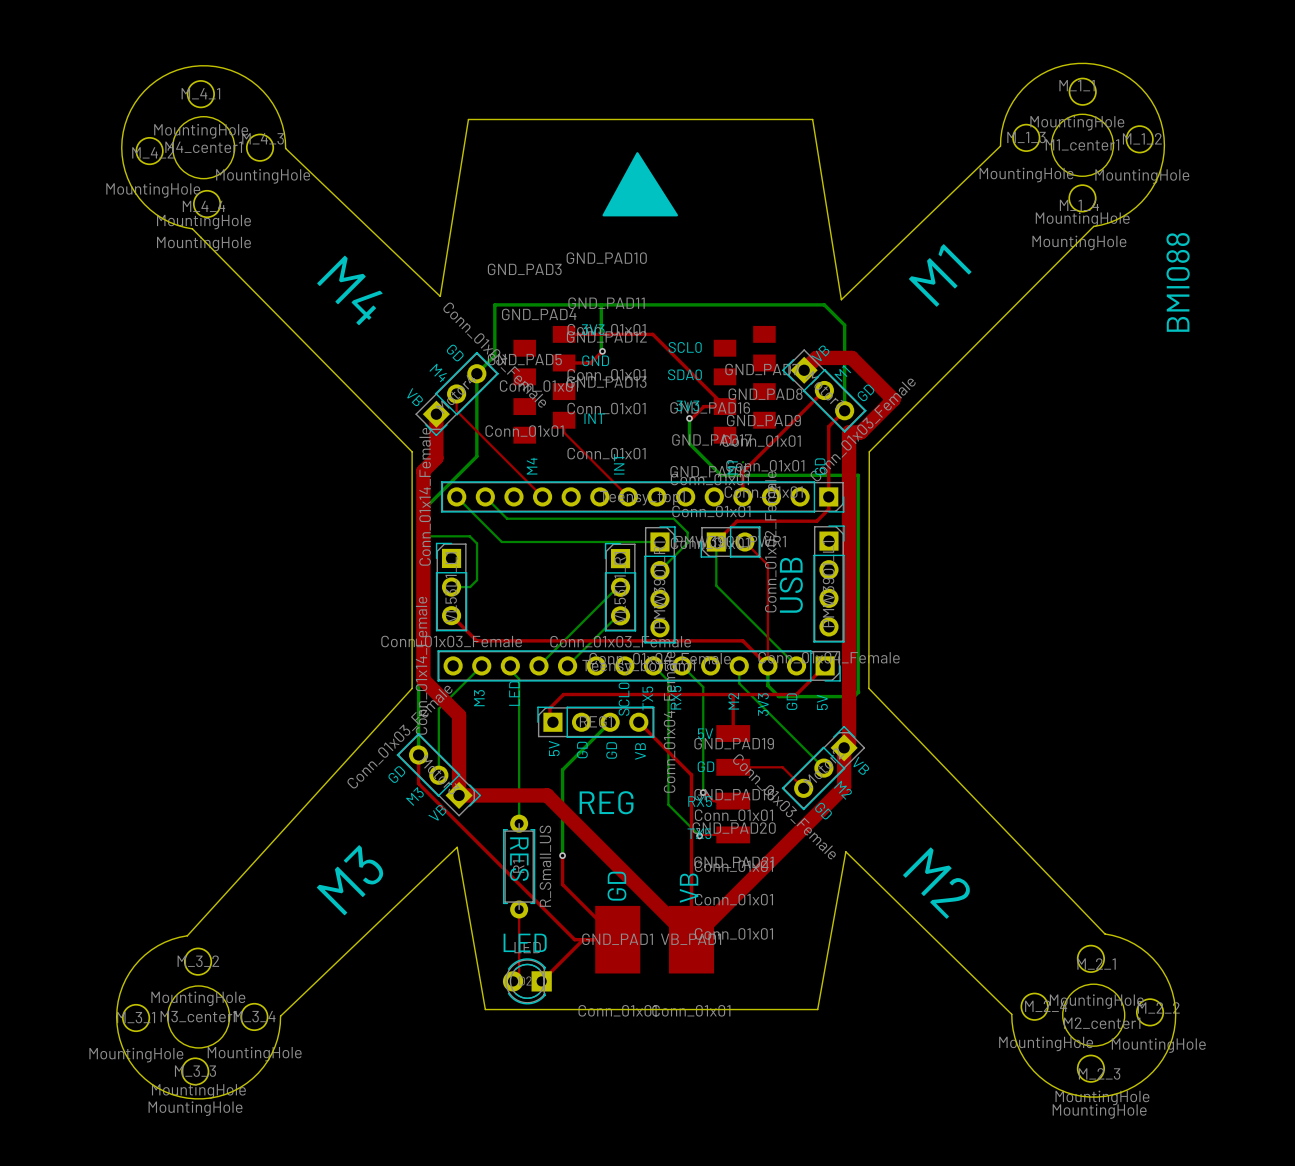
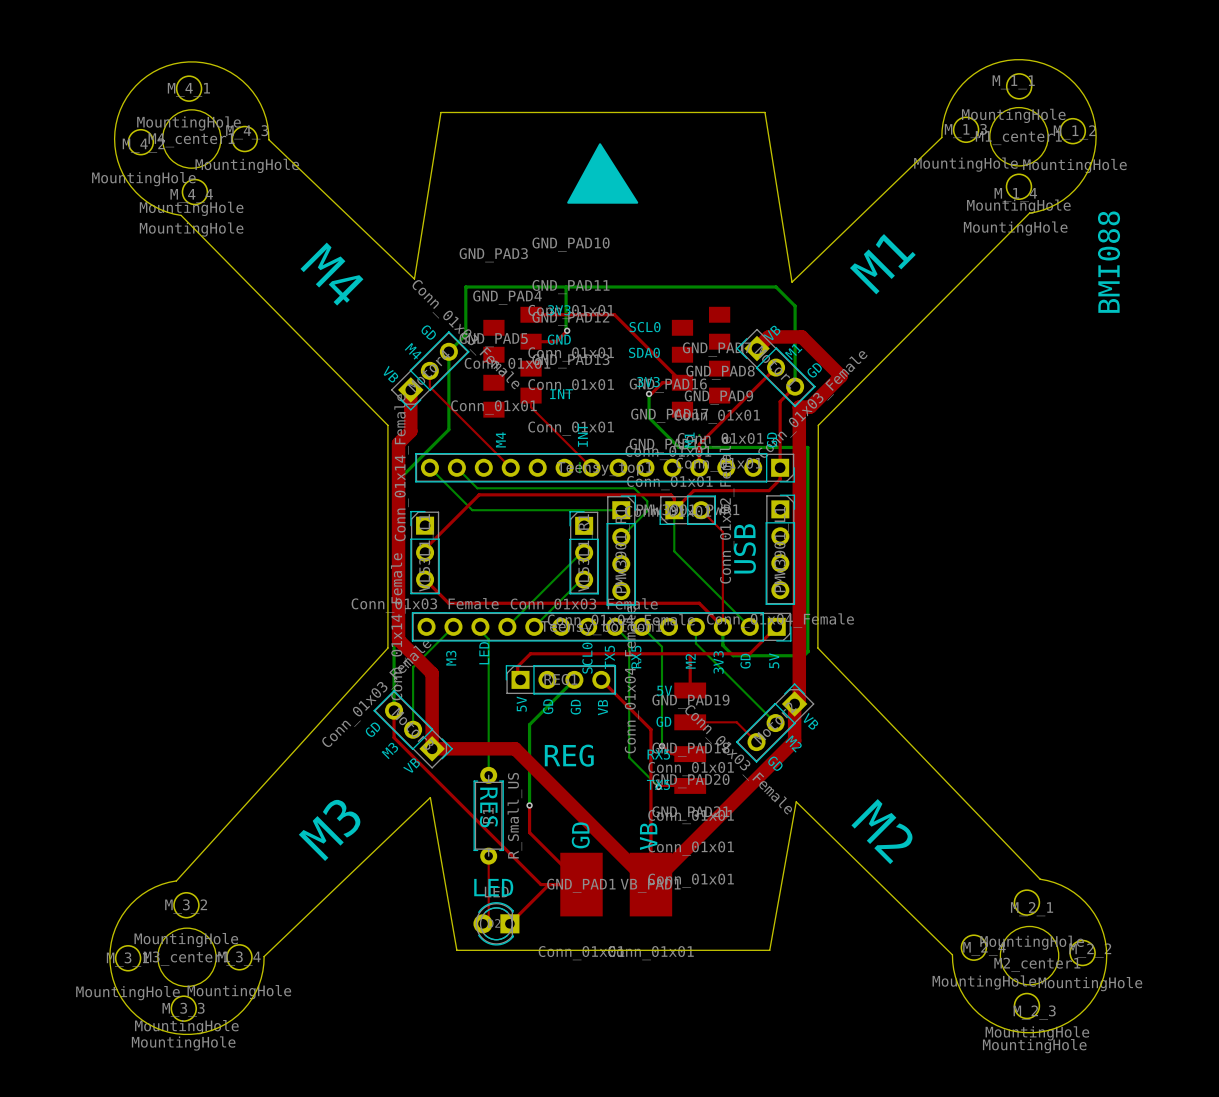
bottom track: none -> (579, 462) (579, 472)
bottom track: (418, 536) (469, 536) (477, 543) (477, 580) (470, 587) (451, 587) -> none
top track: none -> (674, 510) (674, 498) (670, 494) (479, 494) (425, 548)

